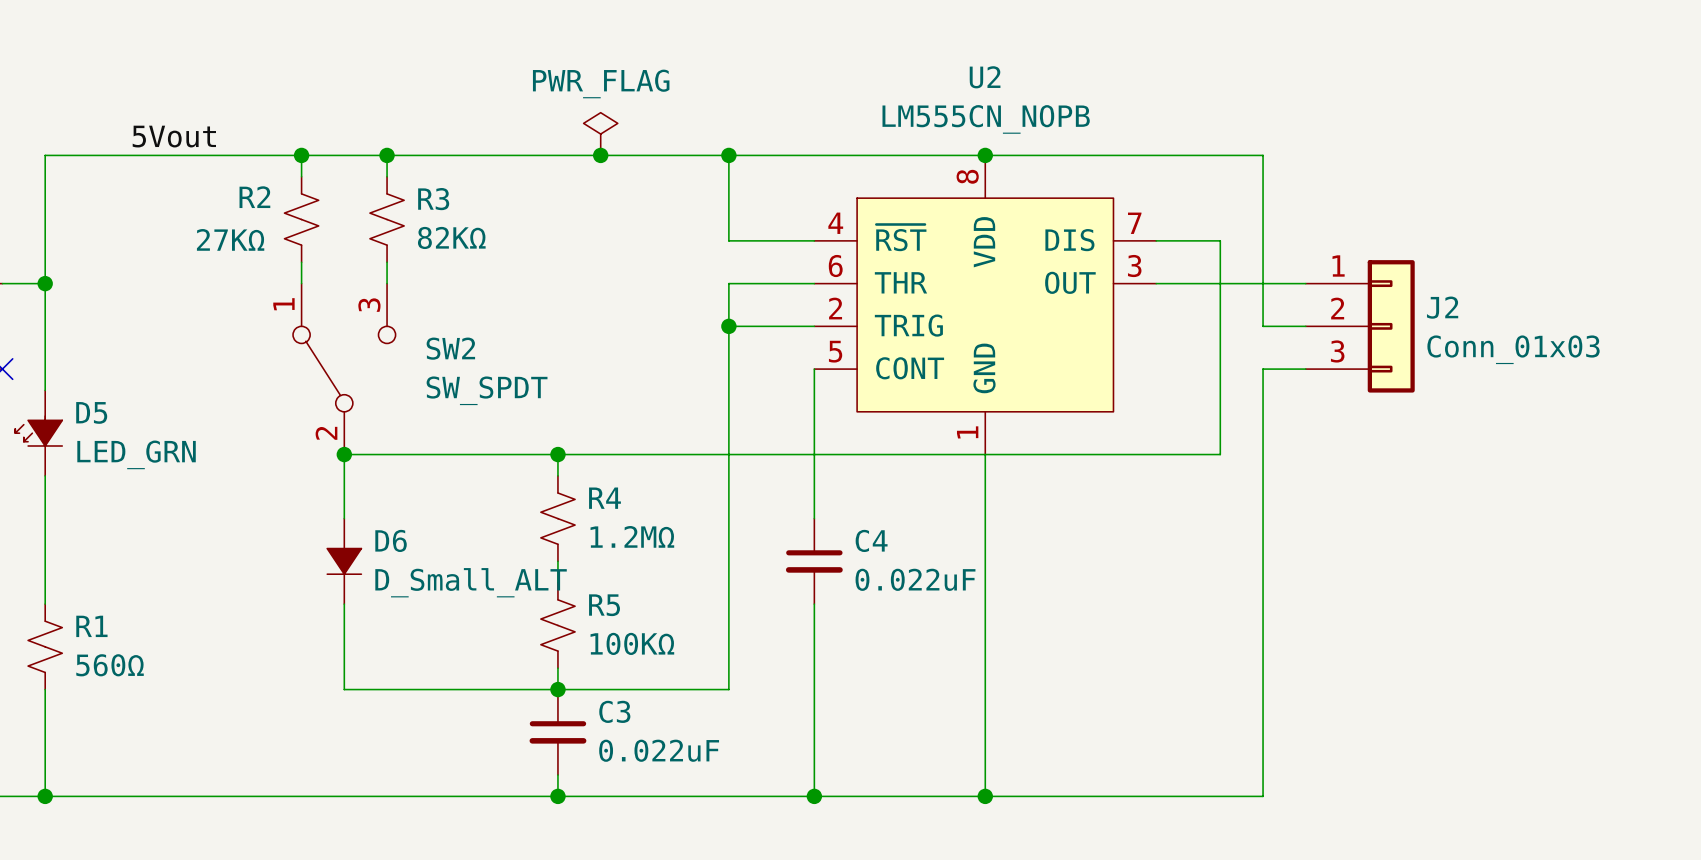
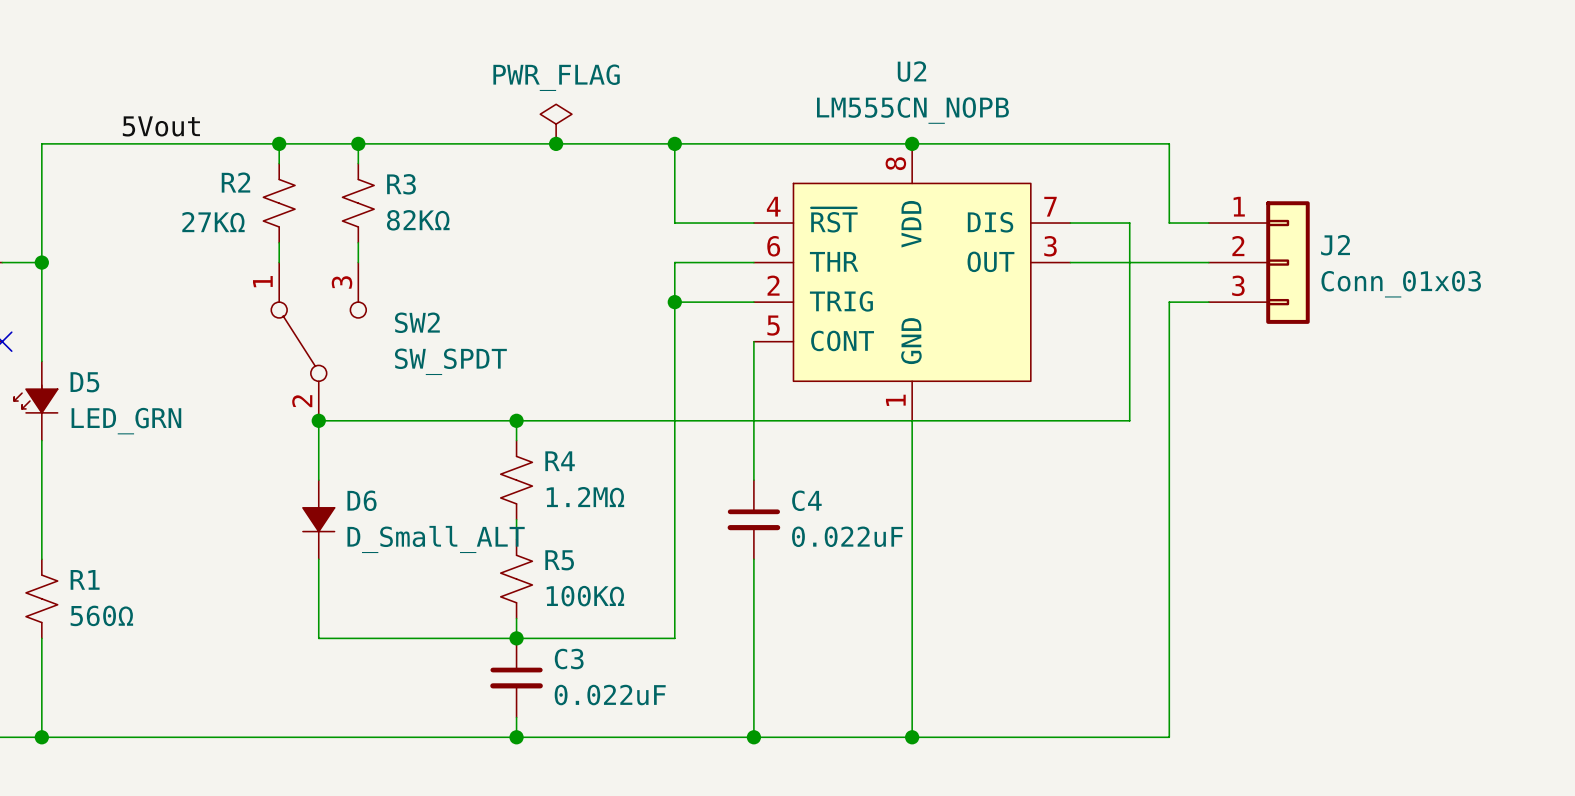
wire: (1263, 240) (1263, 326) -> (1169, 223) (1208, 223)
J2 position: (1360, 326) -> (1259, 262)
wire: (1263, 369) (1305, 369) -> (1169, 341) (1169, 302)

